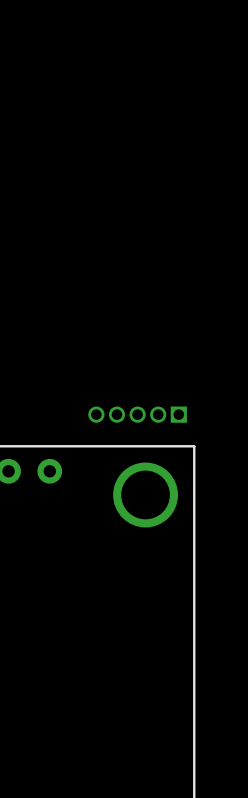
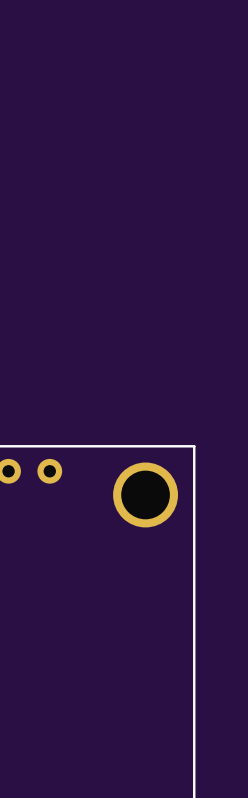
part: (137, 414) -> none

